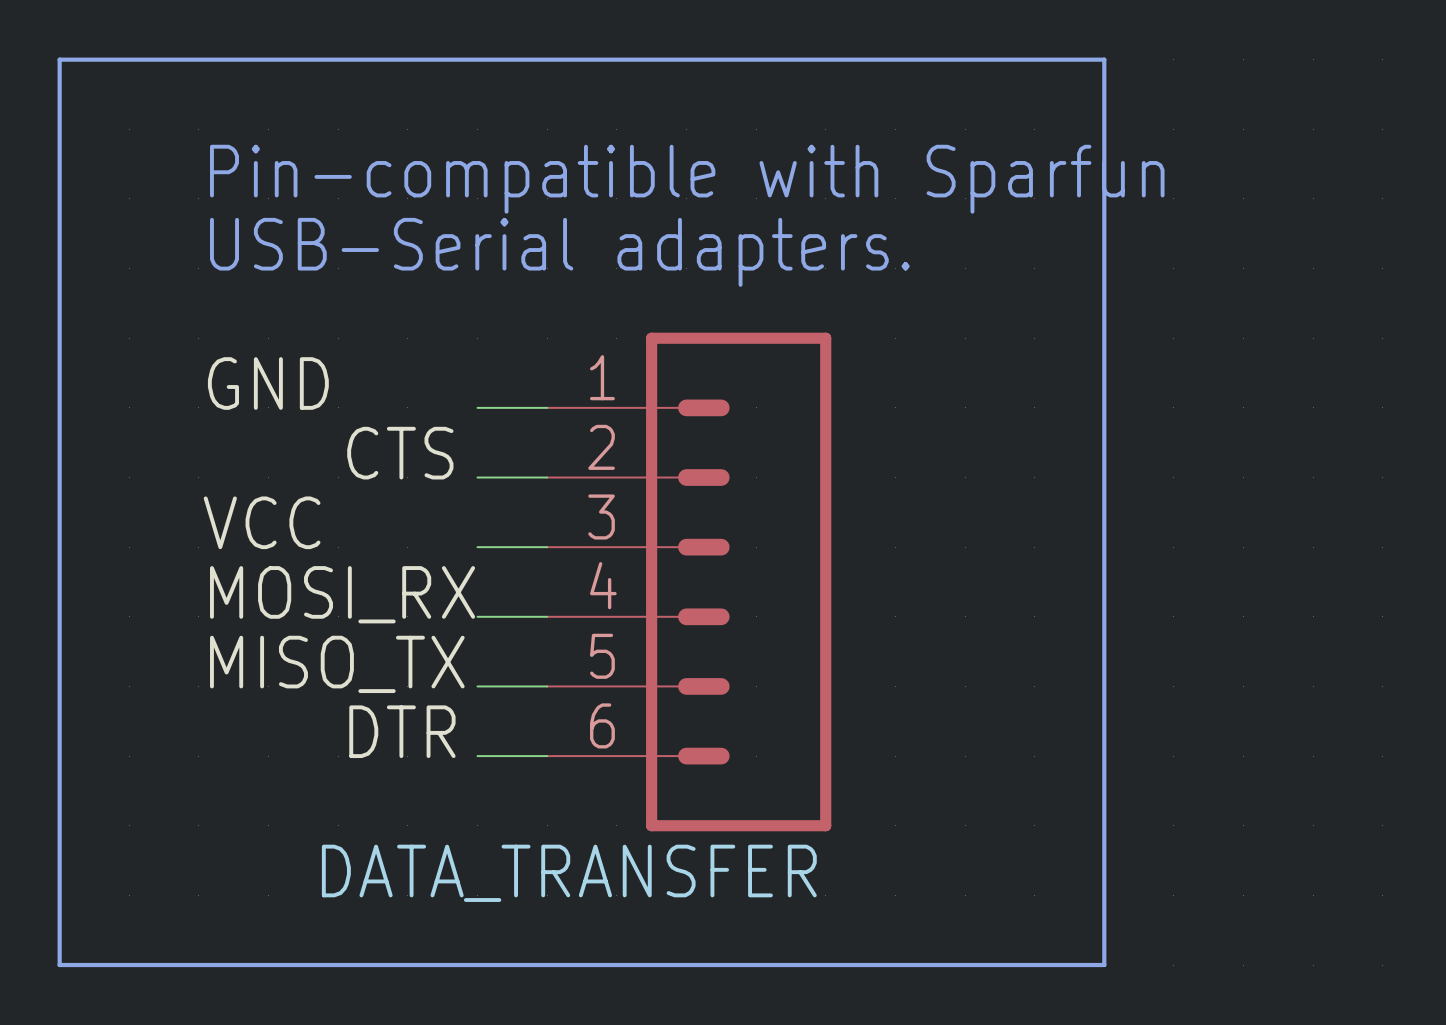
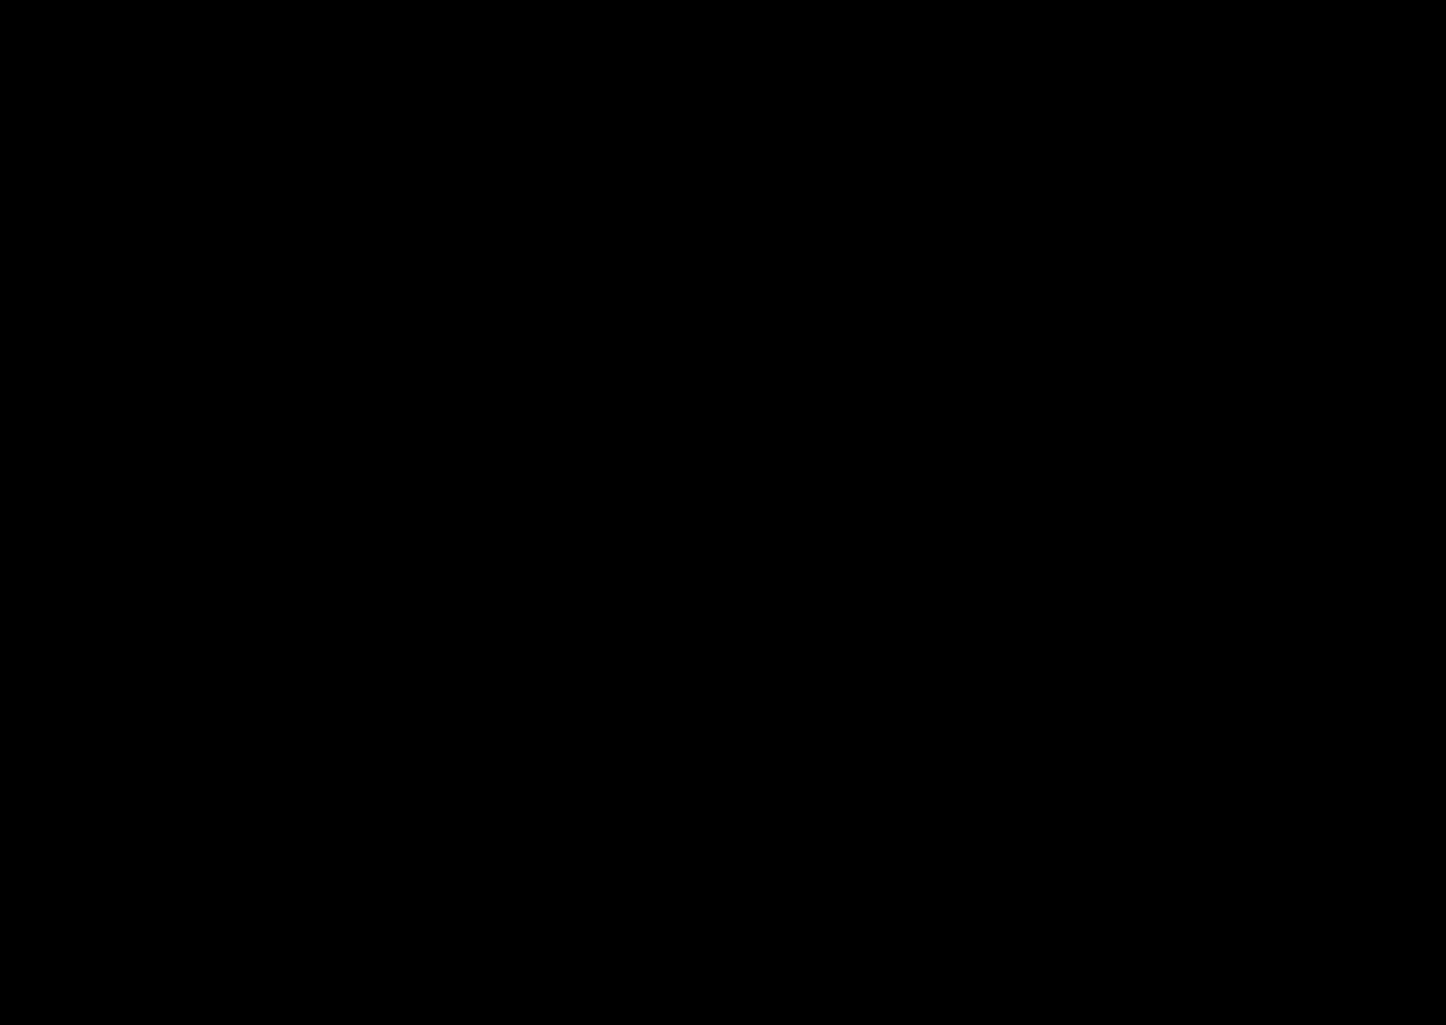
line: (59, 59) (1104, 59) (1104, 965) (59, 965) (59, 59) -> none
text: Pin-compatible with Sparfun (687, 179) -> none
text: USB-Serial adapters. (559, 252) -> none
label: GND (268, 383) -> none
wire: (477, 407) (547, 407) -> none
label: CTS (400, 453) -> none
wire: (477, 477) (547, 477) -> none
label: VCC (262, 522) -> none
wire: (477, 547) (547, 547) -> none
DATA_TRANSFER: (689, 581) -> none
label: MOSI_RX (342, 594) -> none
wire: (477, 616) (547, 616) -> none
label: MISO_TX (337, 664) -> none
wire: (477, 686) (547, 686) -> none
label: DTR (402, 731) -> none
wire: (477, 756) (547, 756) -> none

